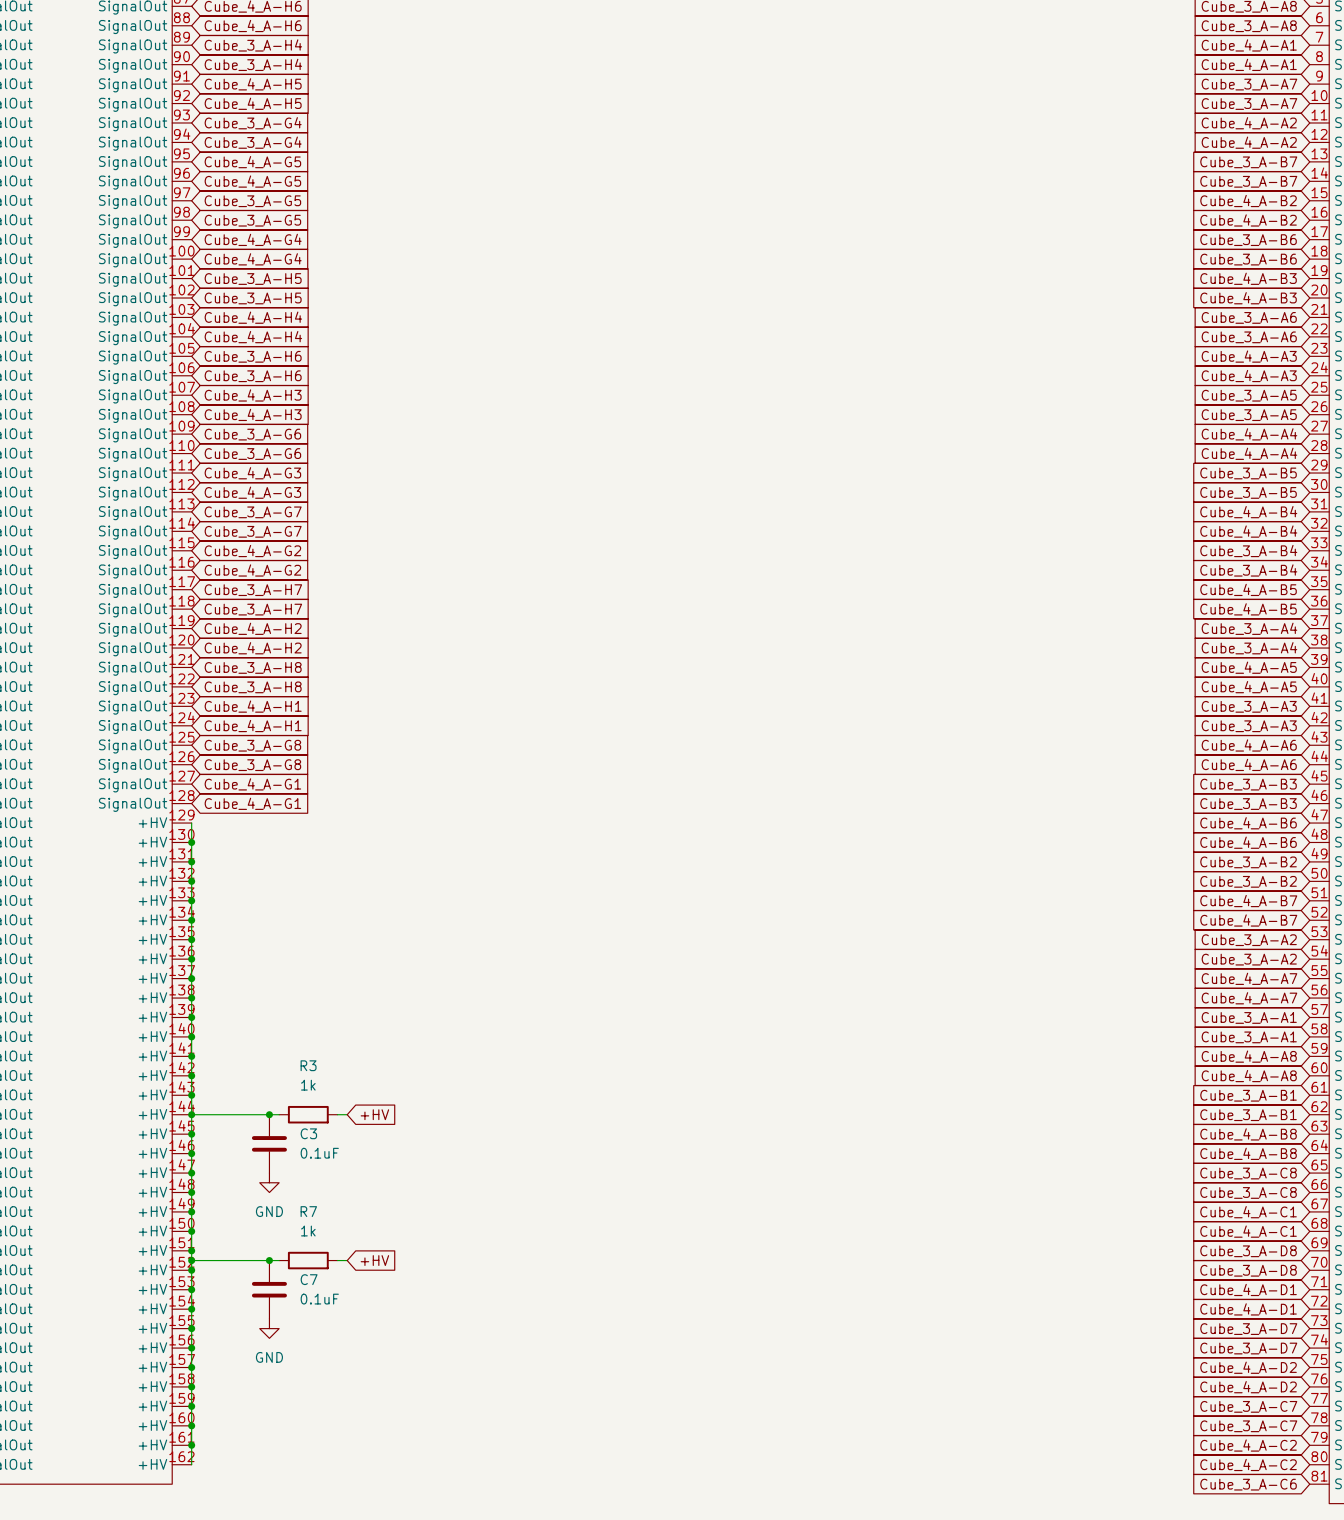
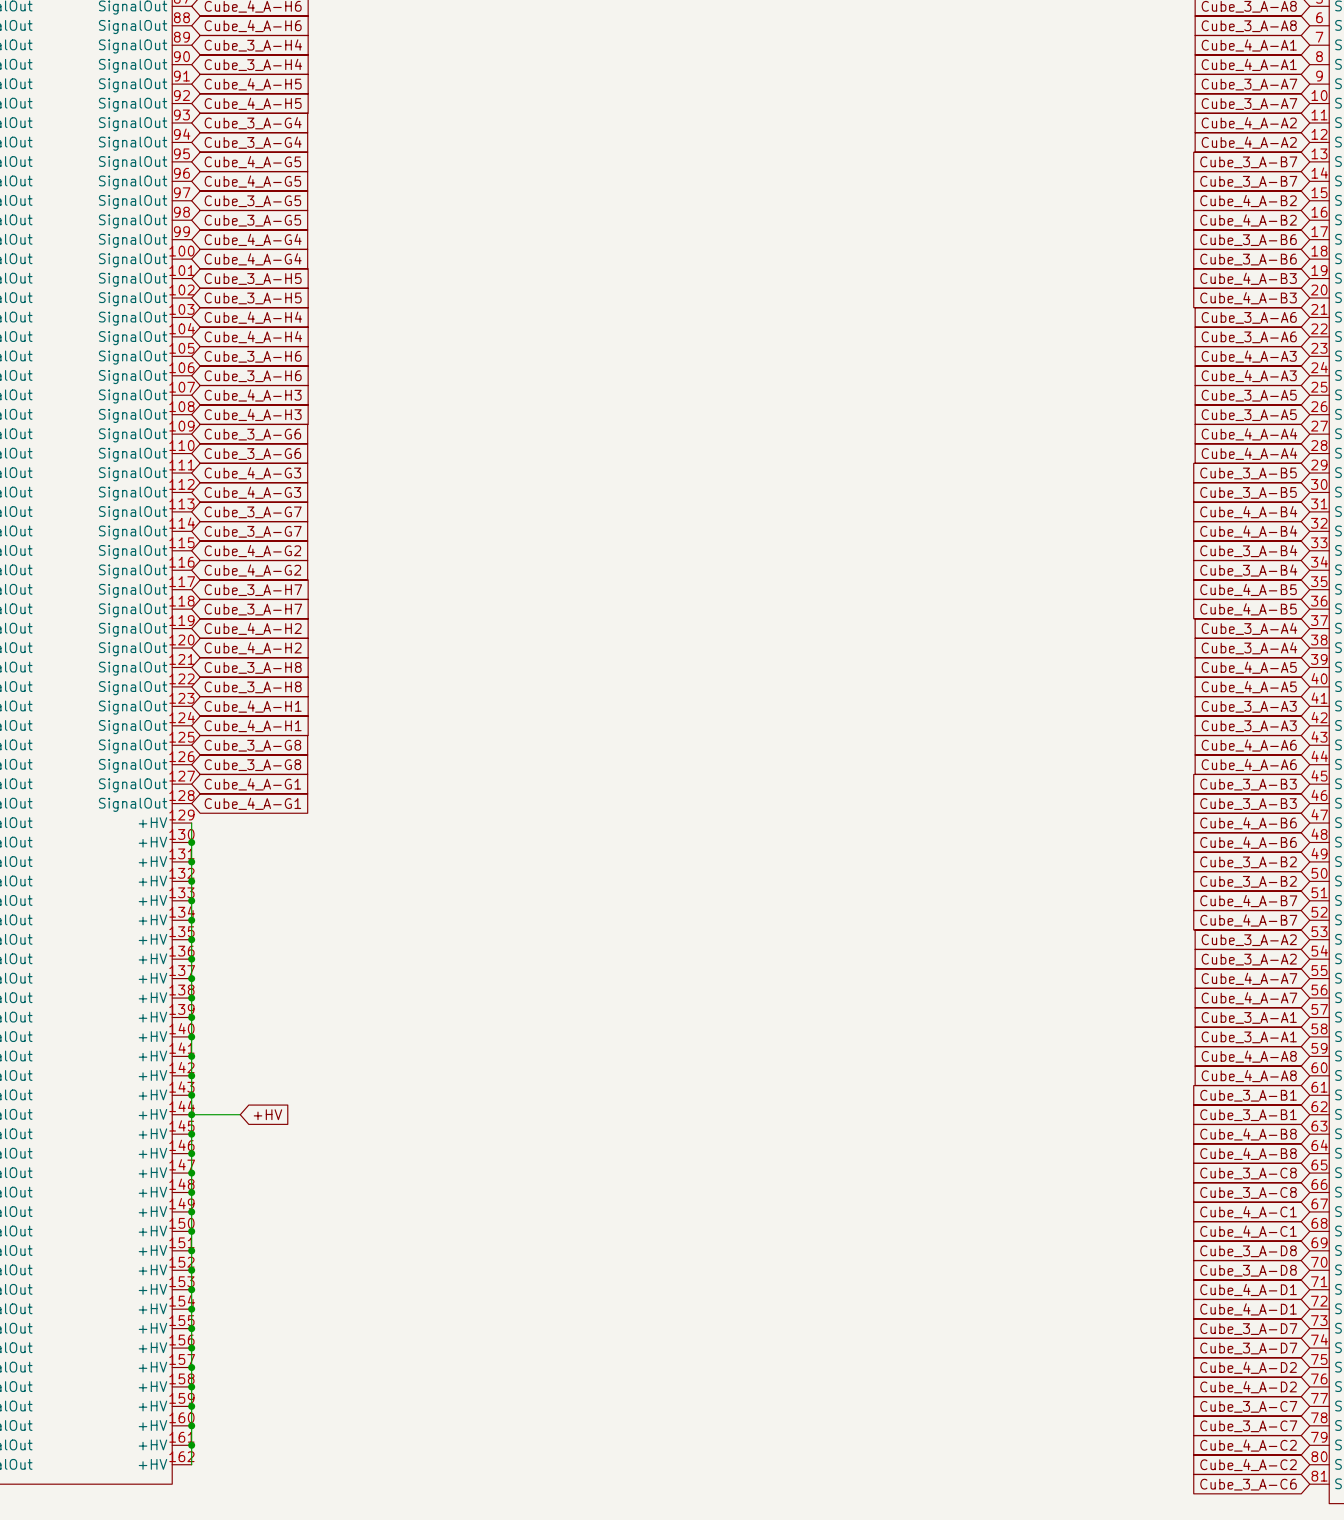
wire: (240, 1114) (279, 1114) -> none
global label: none -> +HV (267, 1114)
junction: (269, 1114) -> none
R3: 1k (308, 1114) -> none
wire: (337, 1114) (347, 1114) -> none
global label: +HV (374, 1114) -> none
C3: 0.1uF (269, 1143) -> none
power symbol: GND (269, 1182) -> none
wire: (191, 1260) (279, 1260) -> none
junction: (191, 1260) -> none
junction: (269, 1260) -> none
R7: 1k (308, 1260) -> none
wire: (337, 1260) (347, 1260) -> none
global label: +HV (374, 1260) -> none
C7: 0.1uF (269, 1289) -> none
power symbol: GND (269, 1328) -> none

